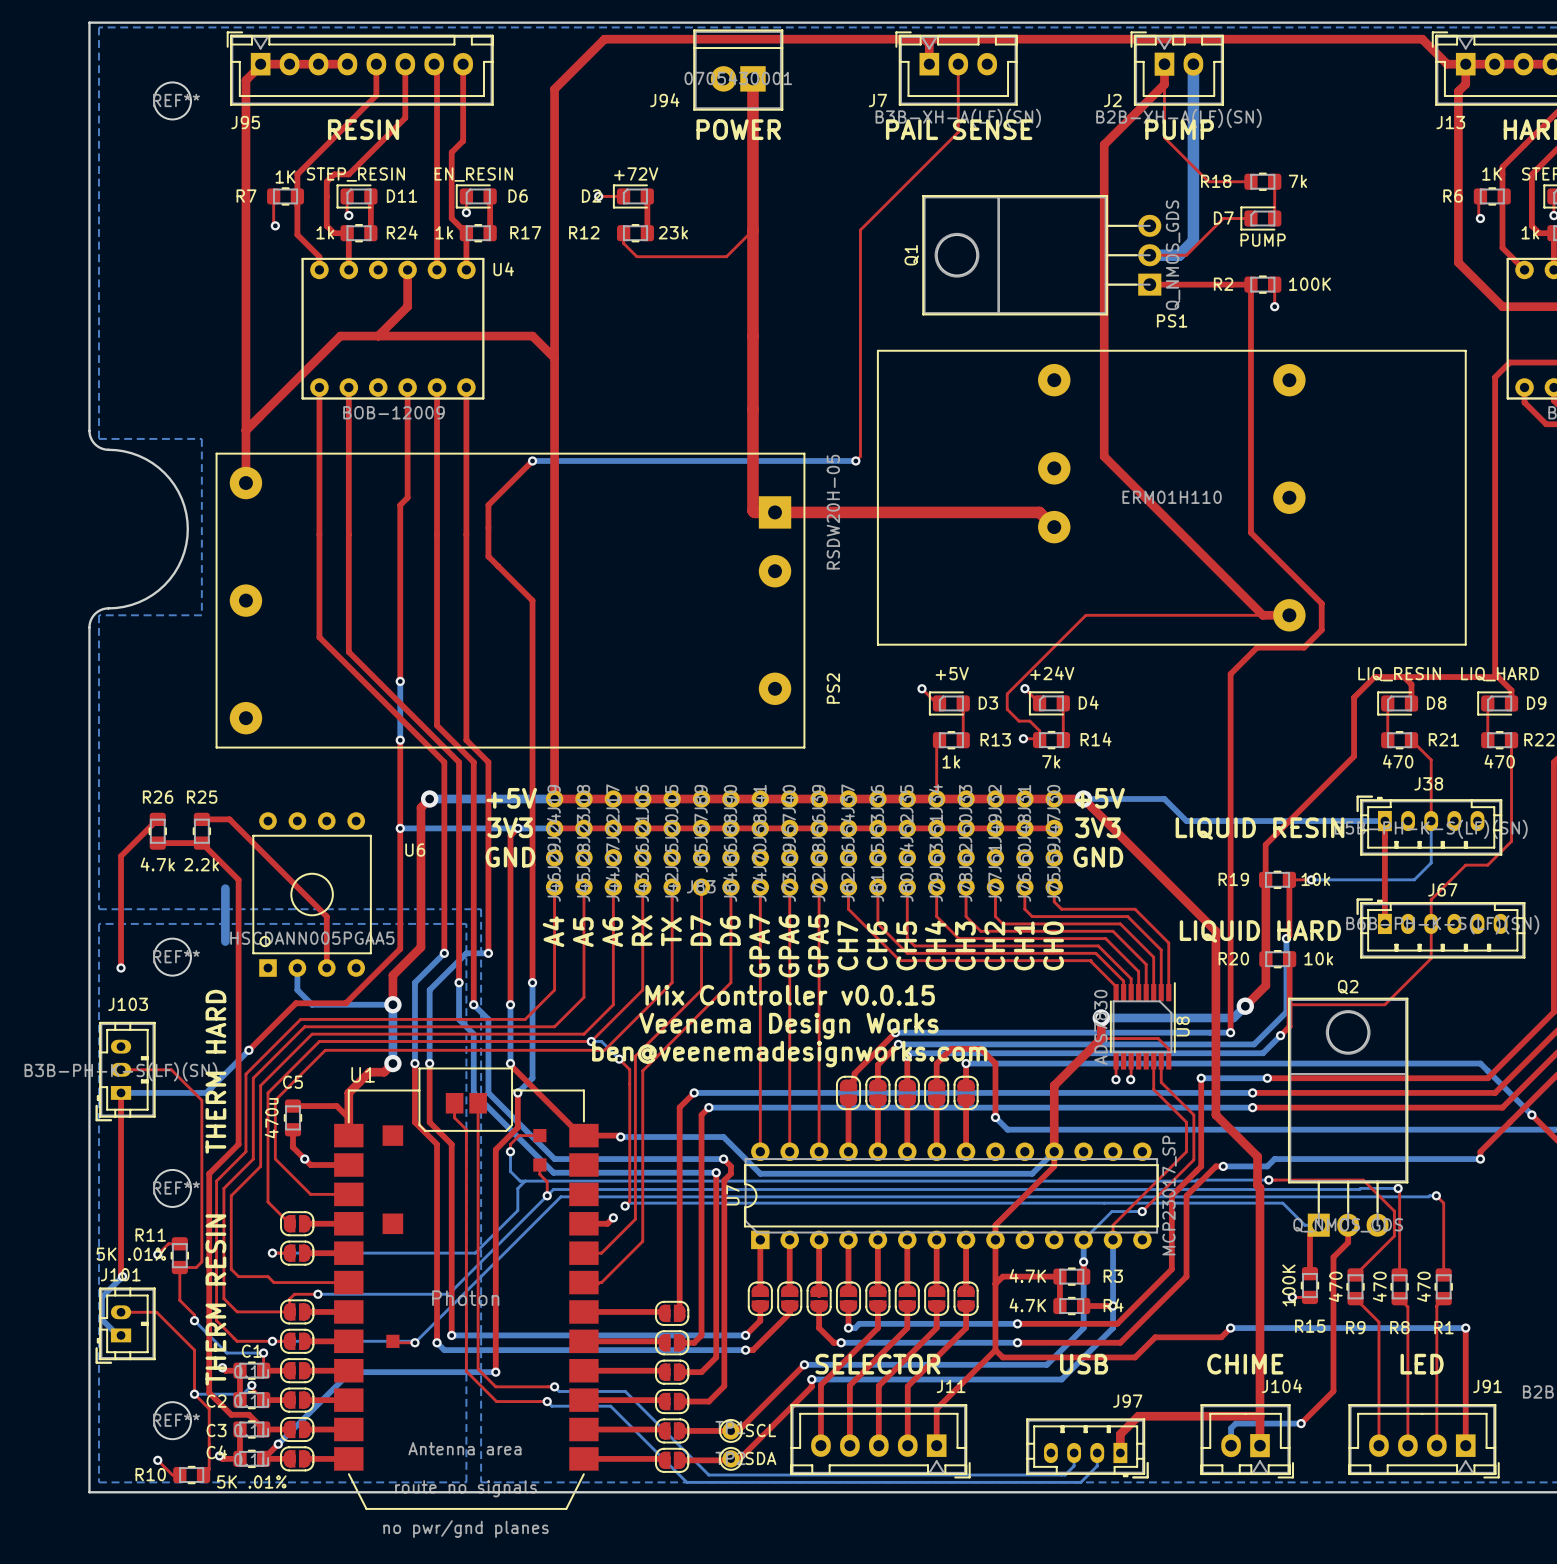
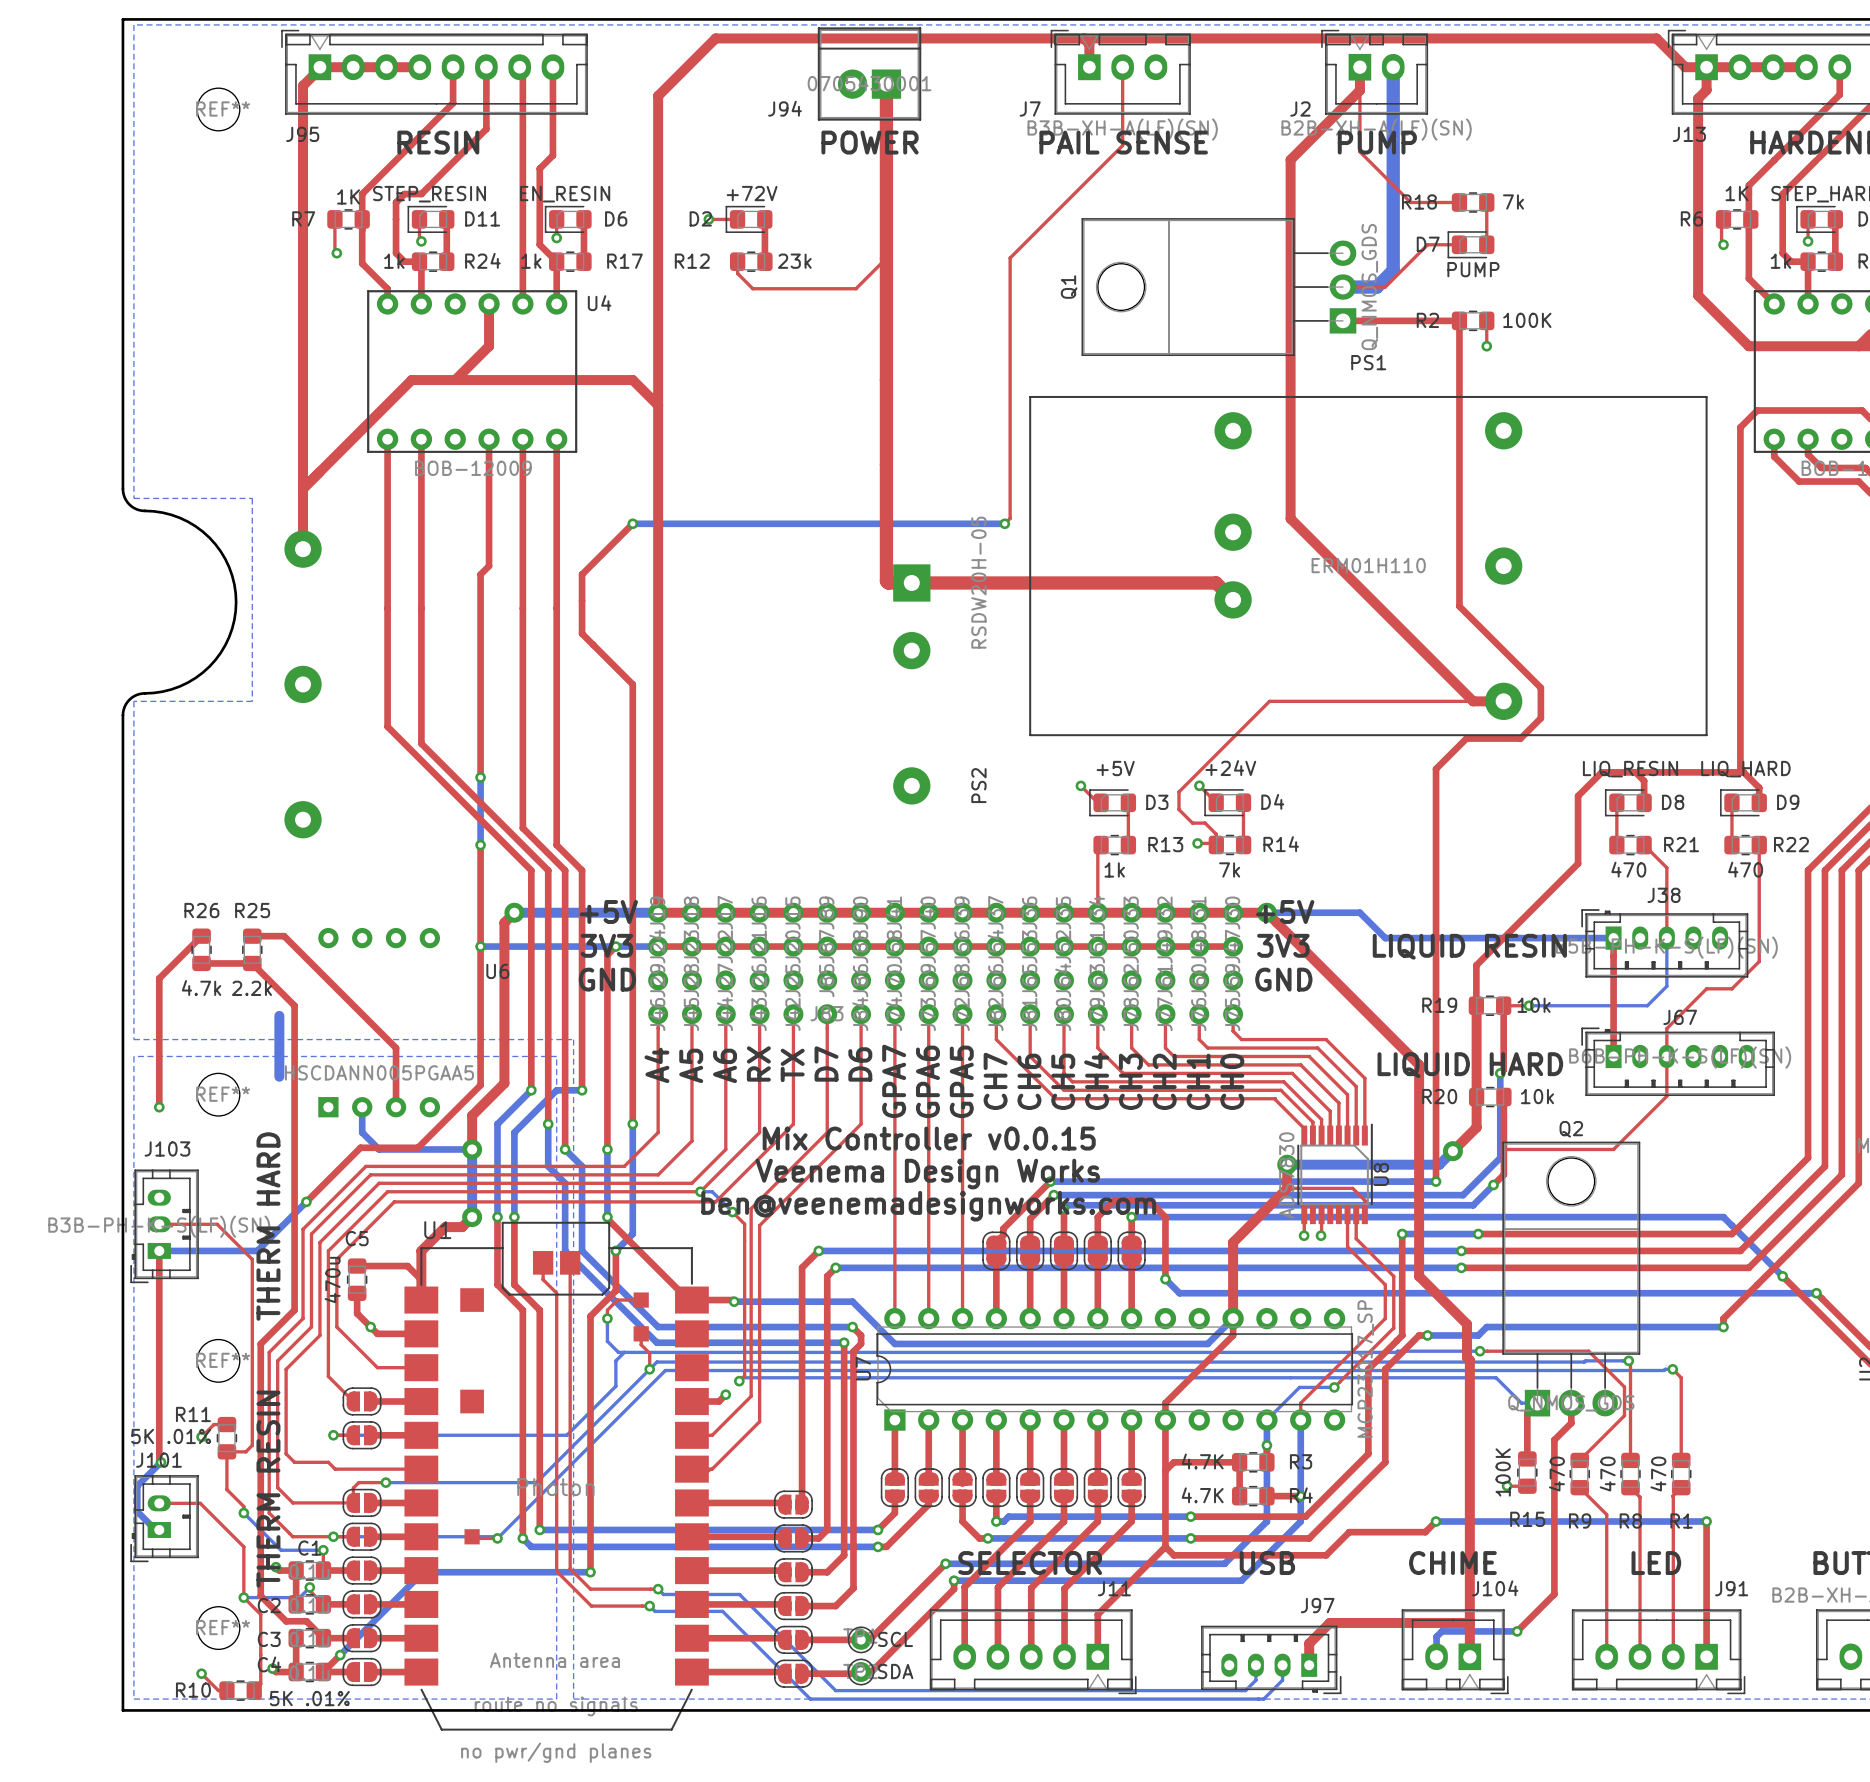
PS2 footprint: [215, 452, 806, 749] -> [284, 530, 931, 839]
U6 footprint: [252, 812, 372, 977] -> [318, 927, 441, 1118]

